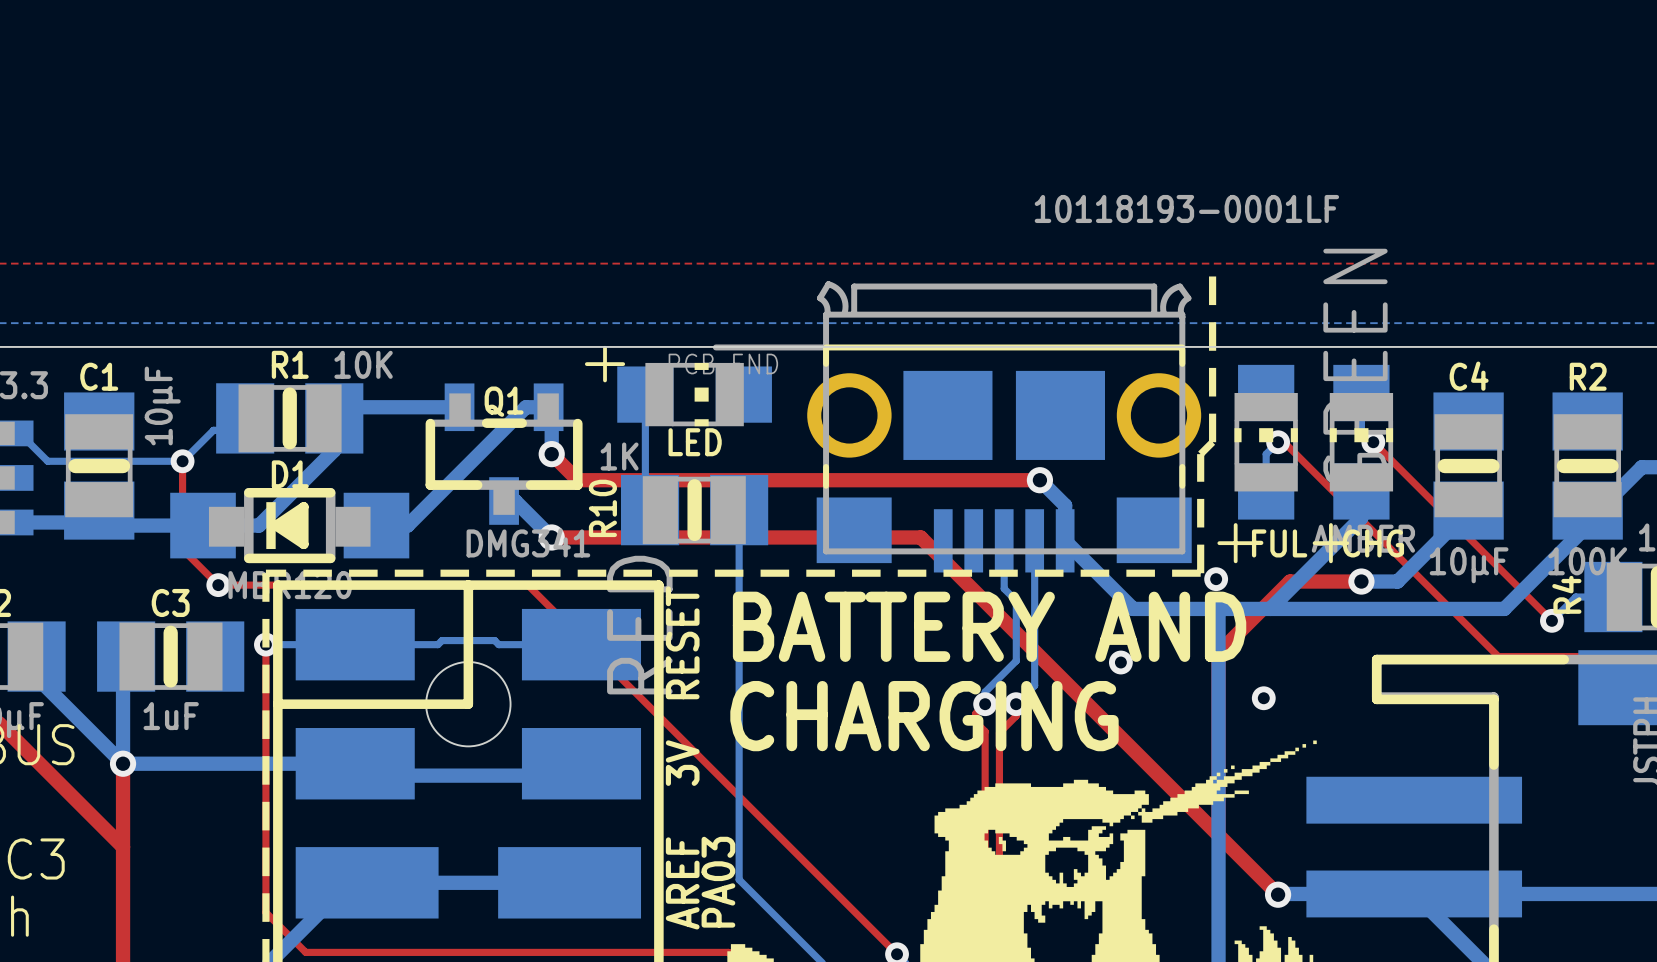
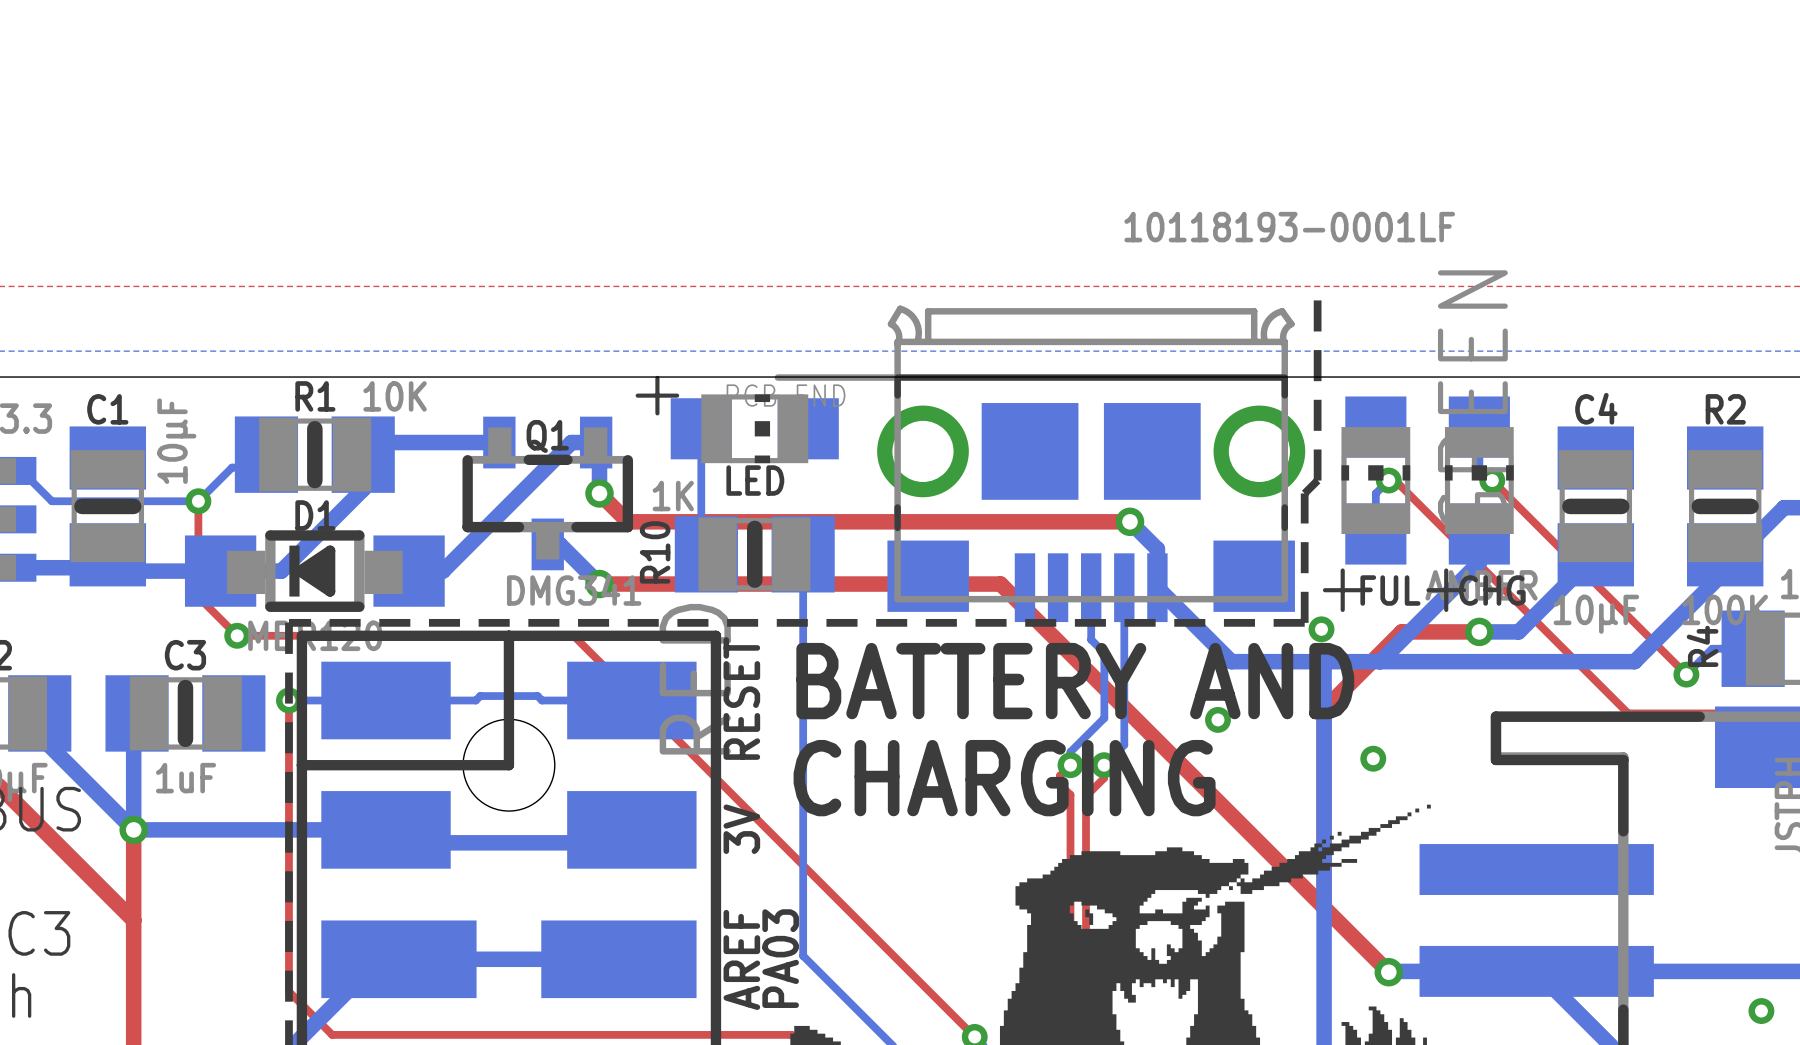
via: none -> (1761, 1011)

